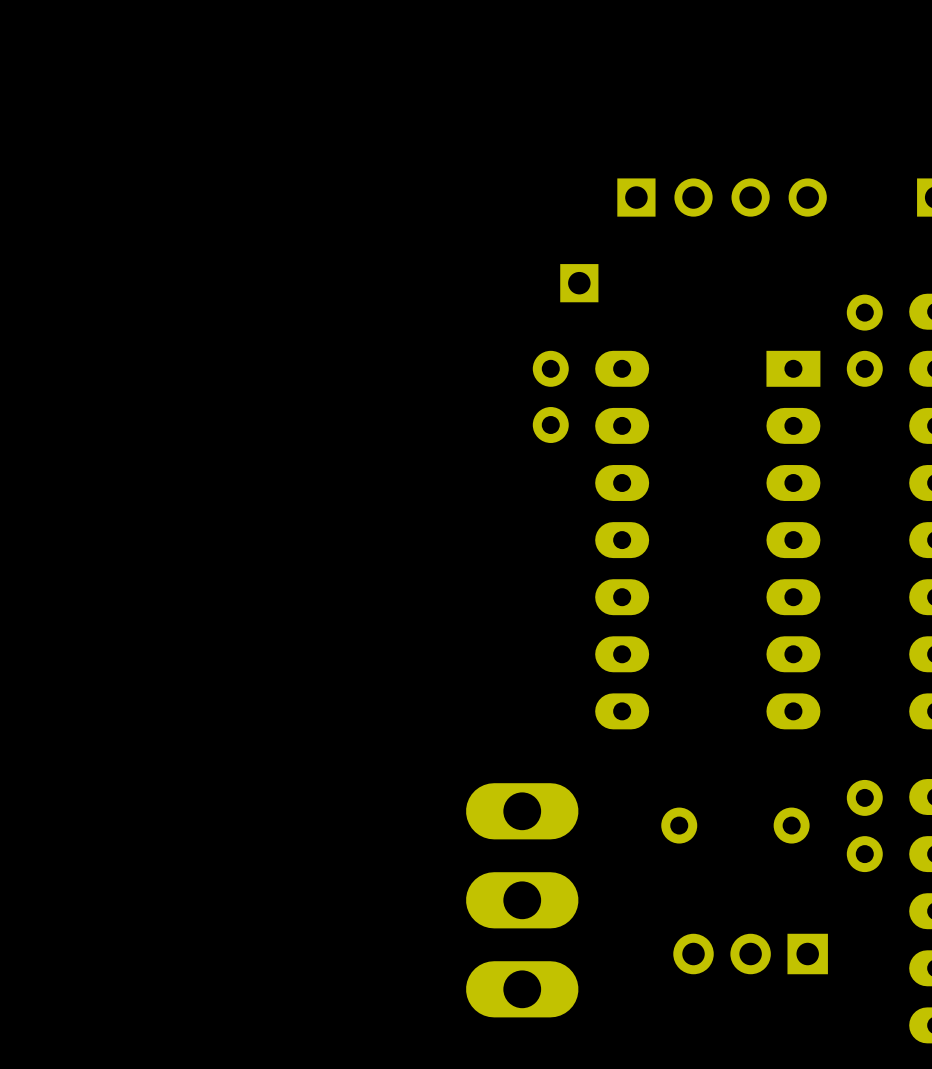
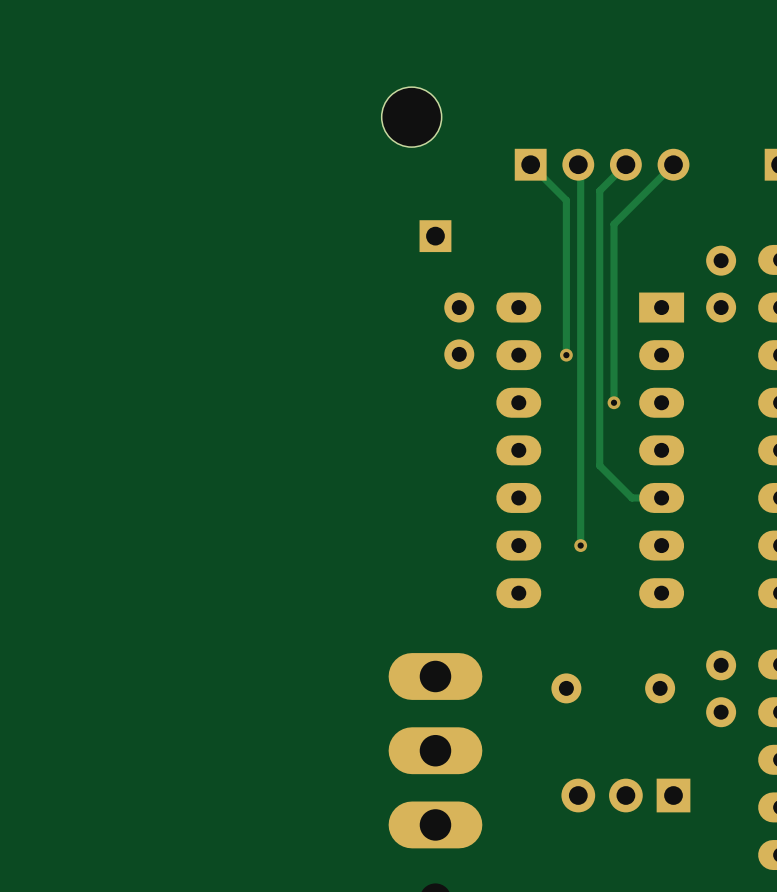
part: none -> (411, 117)
track: none -> (530, 164) (566, 200) (566, 355)
track: none -> (578, 164) (580, 167) (580, 545)
track: none -> (625, 164) (599, 190) (599, 465) (631, 497) (661, 497)
track: none -> (673, 164) (614, 224) (614, 402)
part position: (579, 283) -> (435, 236)
via: none -> (566, 355)
via: none -> (614, 402)
via: none -> (580, 545)

